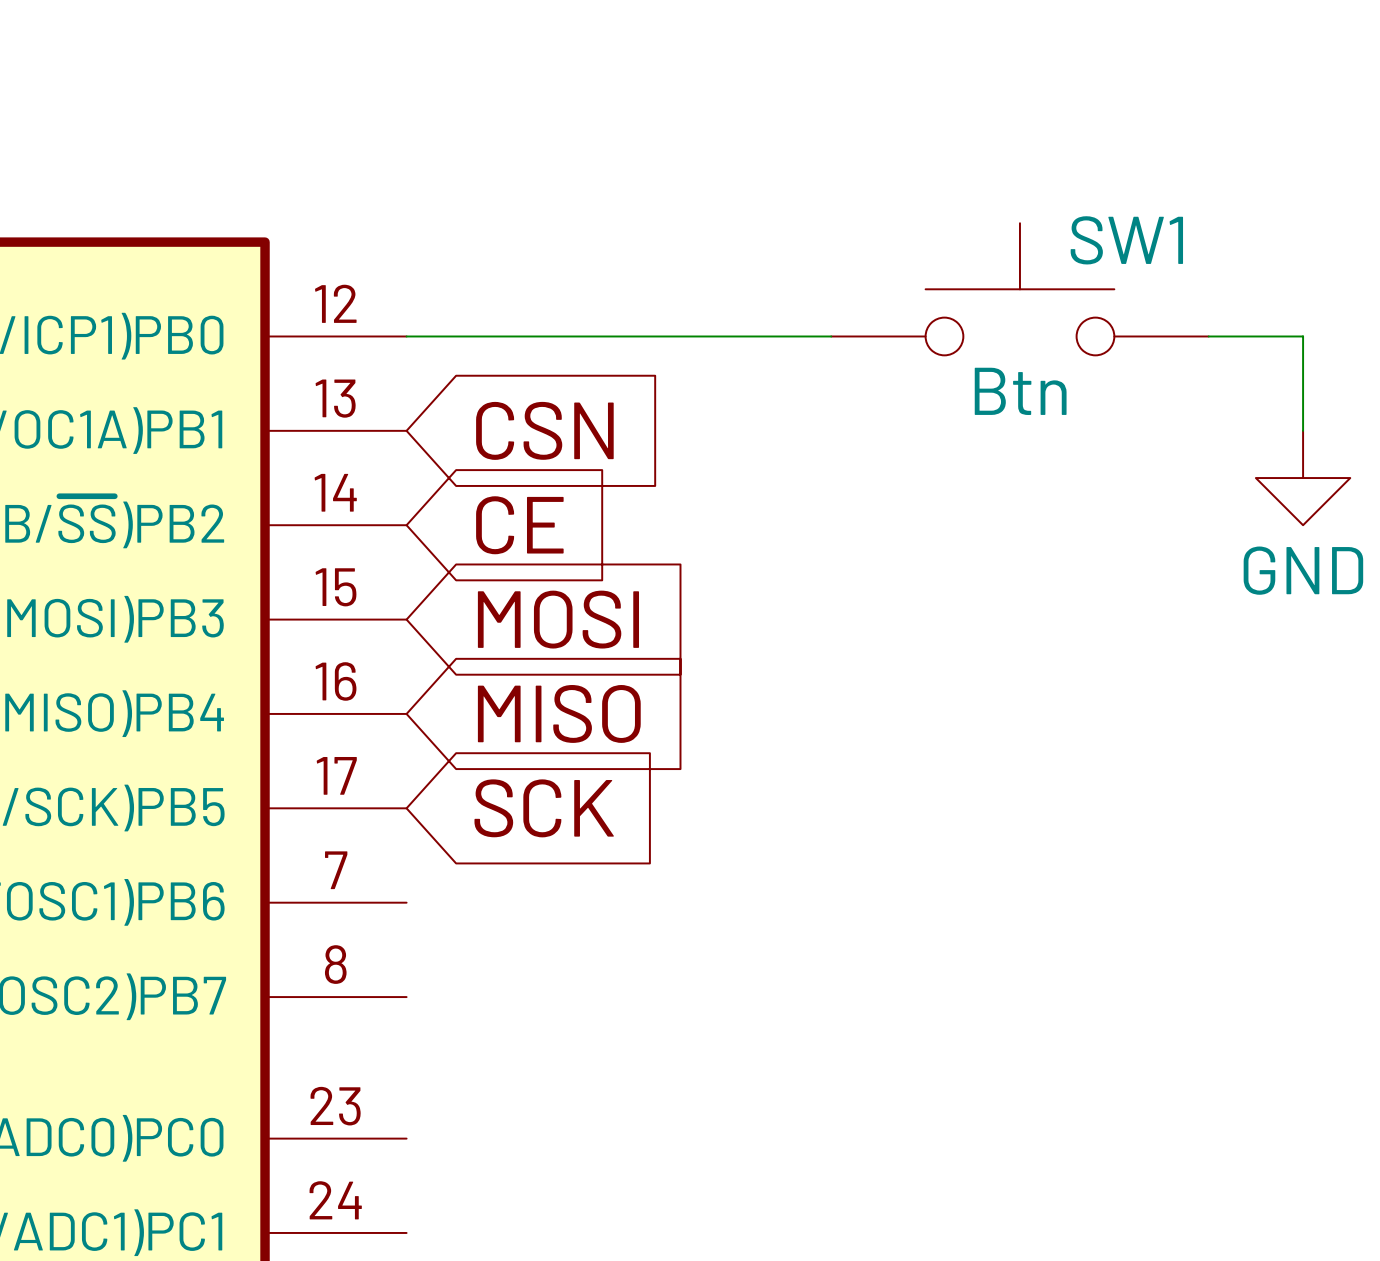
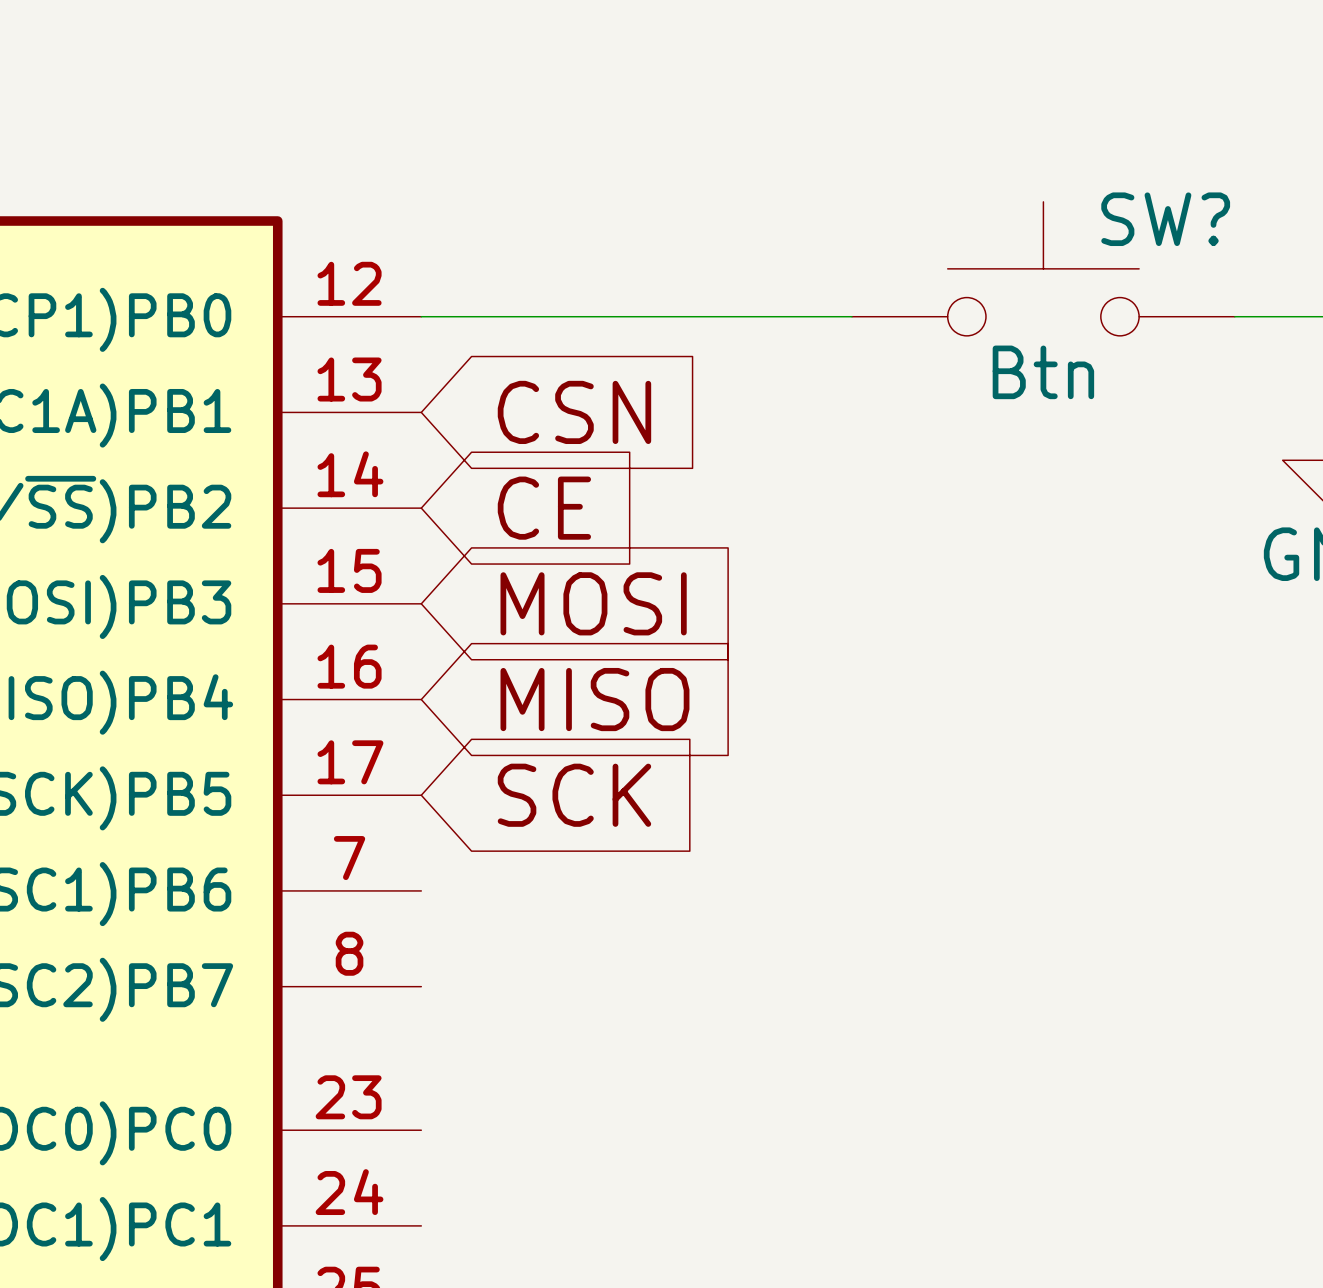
SW1 name: SW1 (1126, 240) -> SW? (1165, 219)

